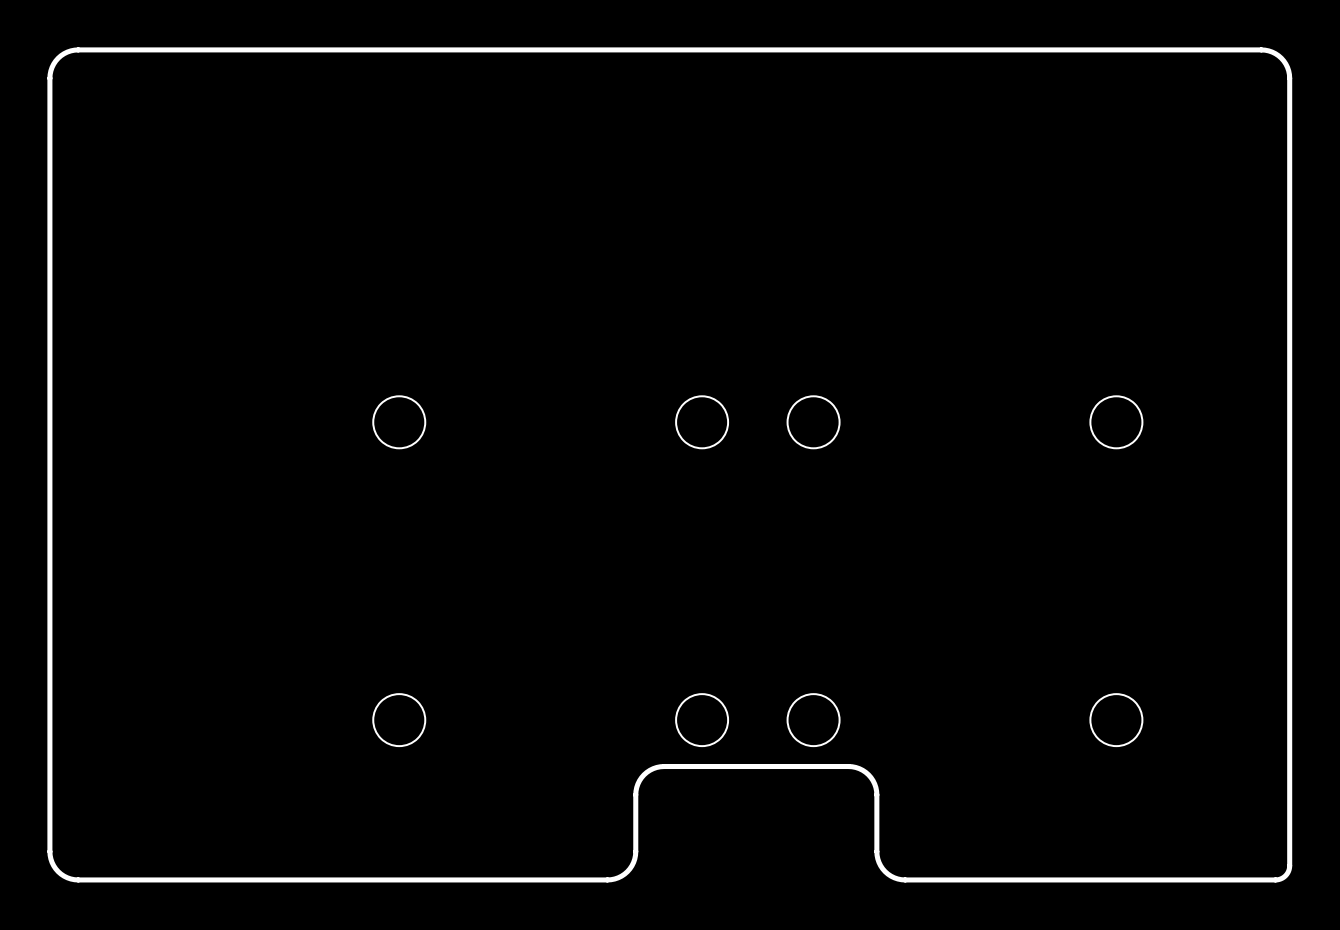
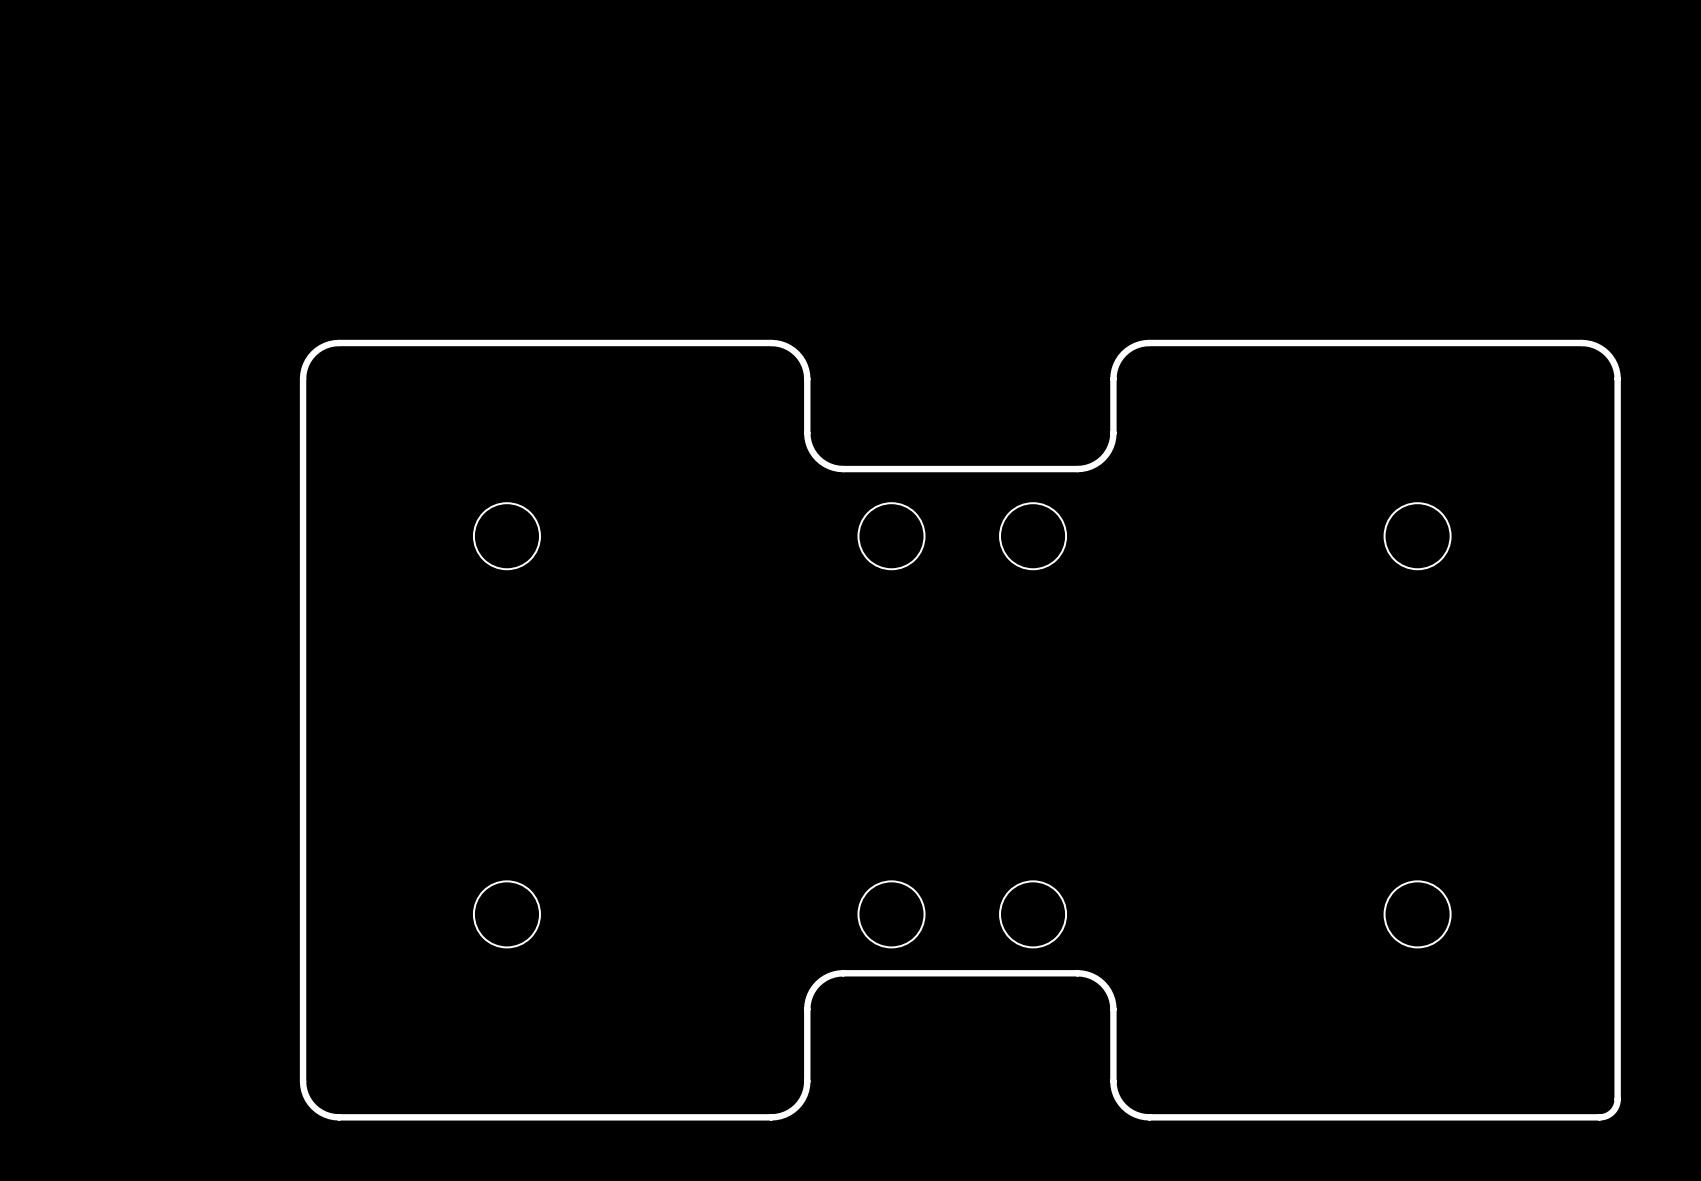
board edge: (267, 879) (74, 879) (61, 874) (50, 858) (49, 78) (55, 61) (70, 50) (1261, 49) (1278, 55) (1285, 64) (1289, 78) (1289, 865) (1287, 872) (1280, 878) (1259, 879) -> (339, 1117) (325, 1114) (313, 1106) (305, 1095) (303, 1081) (303, 379) (305, 365) (313, 353) (325, 345) (339, 343) (780, 344) (796, 353) (806, 369) (807, 437) (812, 451) (825, 464) (843, 469) (1077, 469) (1091, 466) (1102, 458) (1112, 442) (1113, 379) (1116, 365) (1127, 350) (1144, 343) (1581, 343) (1599, 347) (1612, 361) (1617, 379) (1617, 1099) (1612, 1112) (1599, 1117)

